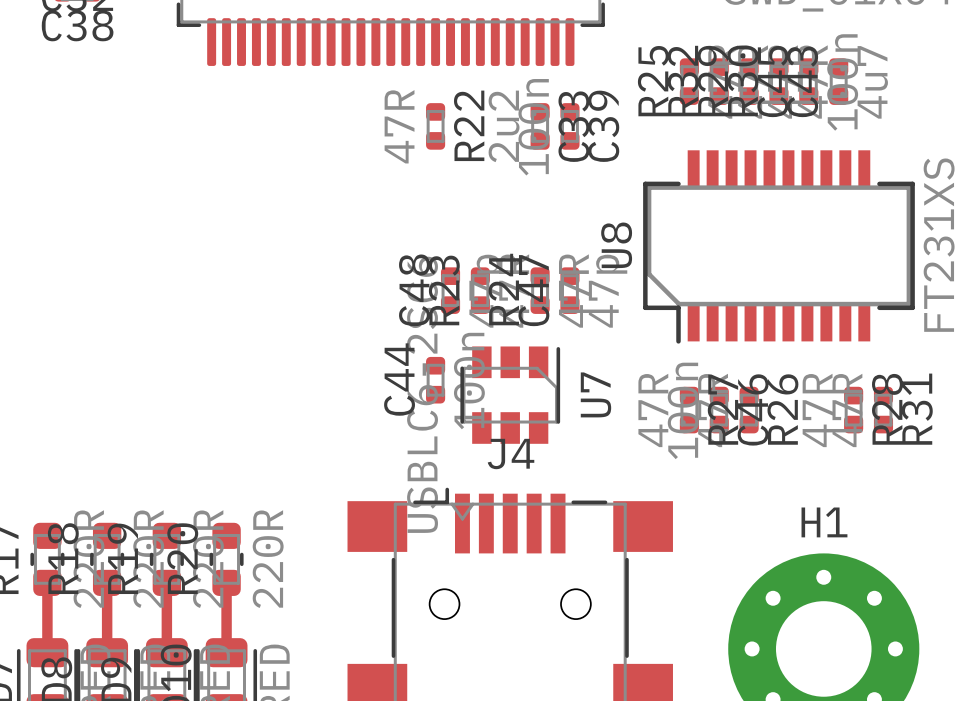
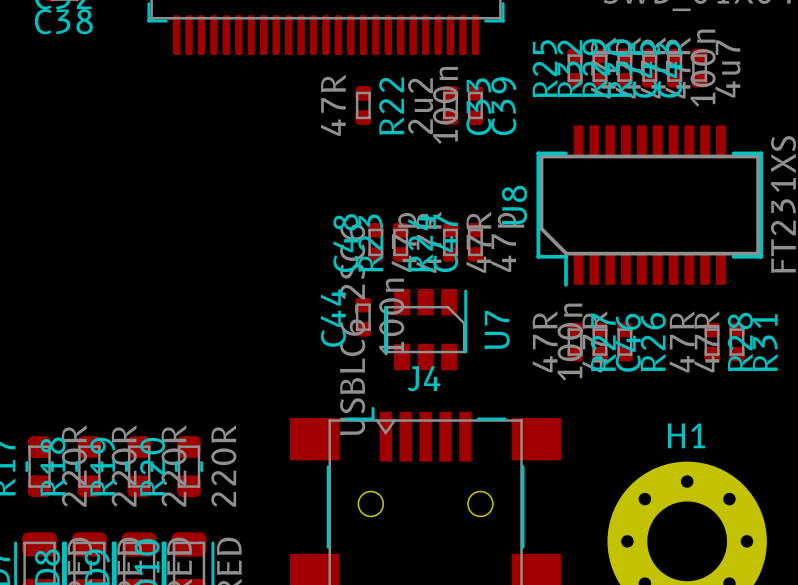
top track: (47, 582) (47, 652) -> none
top track: (107, 582) (107, 652) -> none
top track: (166, 582) (166, 652) -> none
top track: (226, 582) (226, 652) -> none

